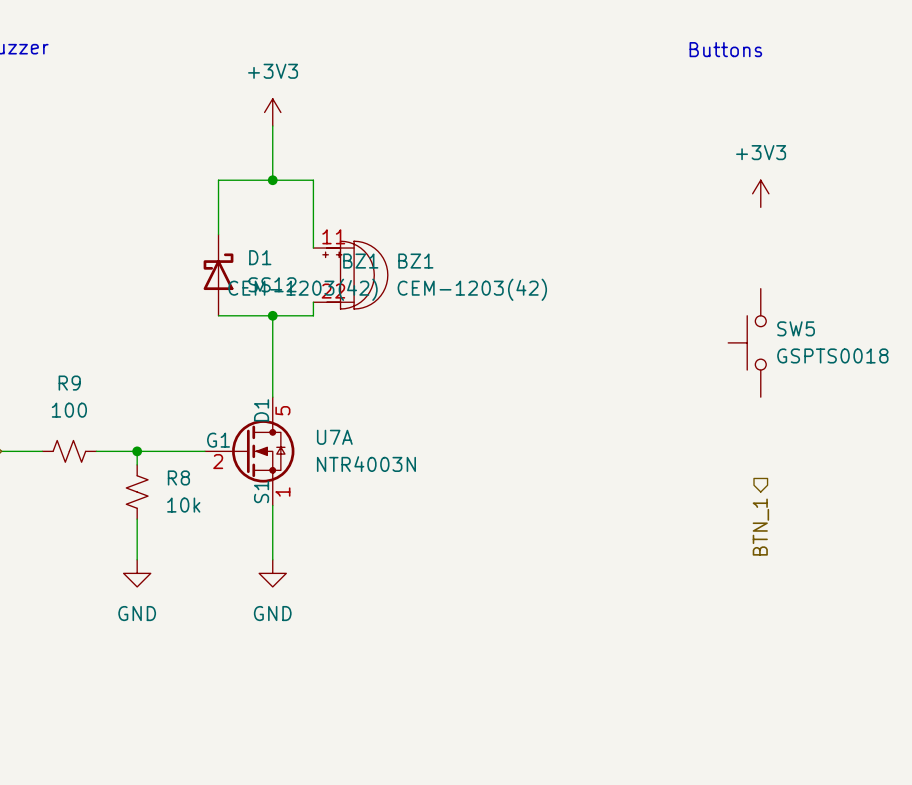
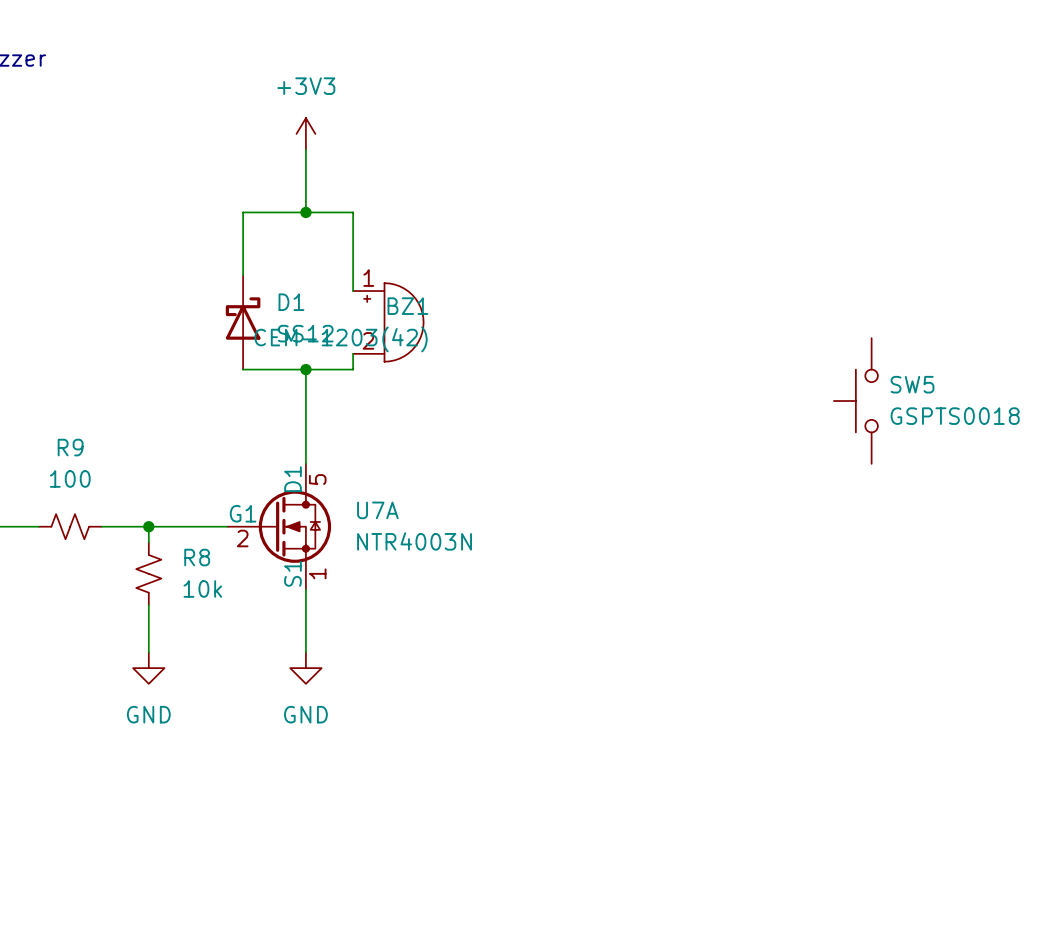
text: Buttons (725, 49) -> none
power symbol: +3V3 (760, 193) -> none
BZ1: CEM-1203(42) (357, 275) -> none
hierarchical label: BTN_1 (760, 527) -> none

